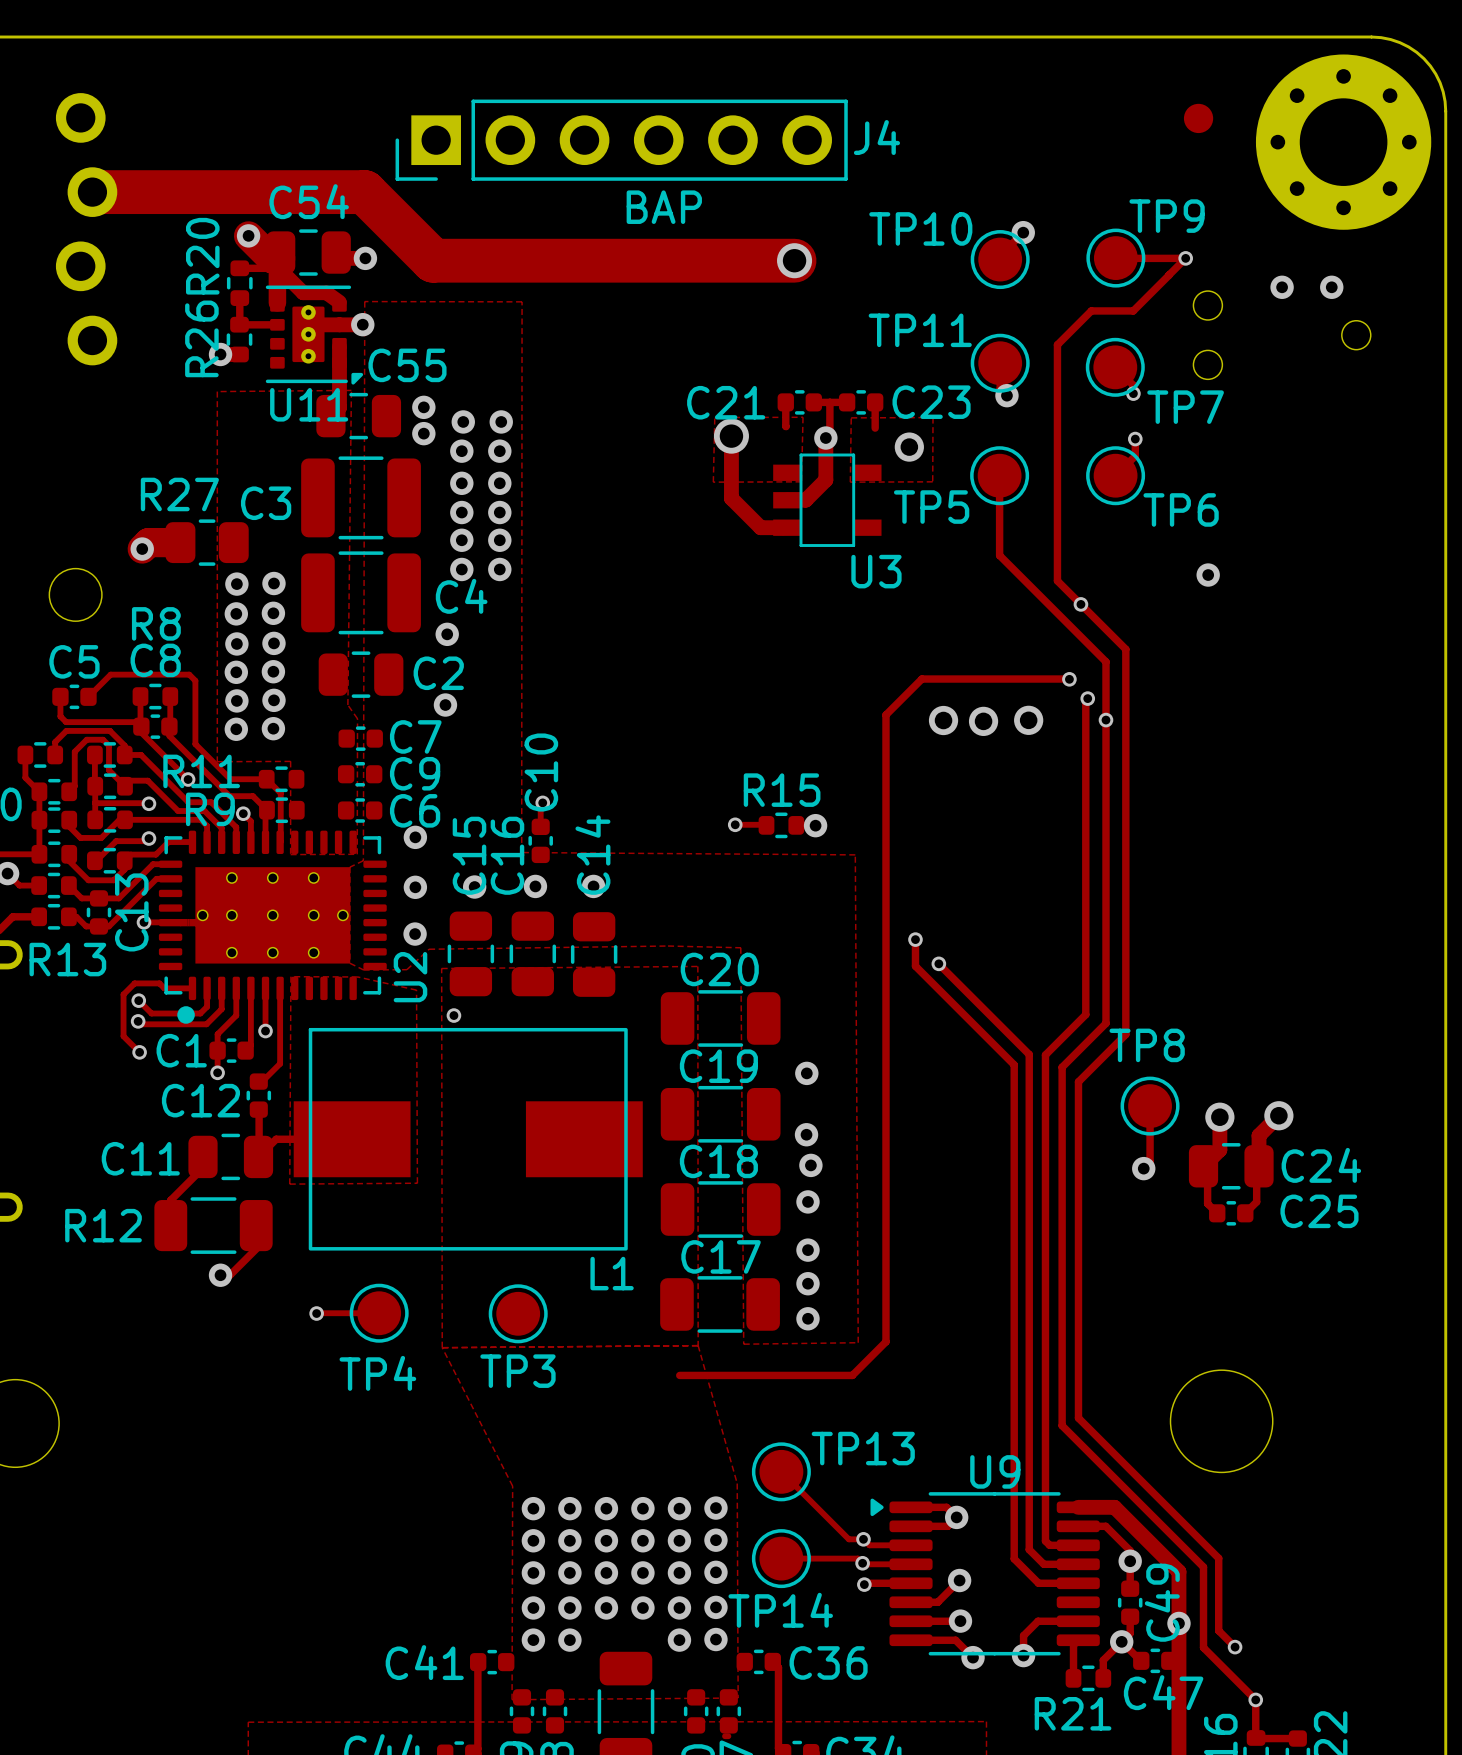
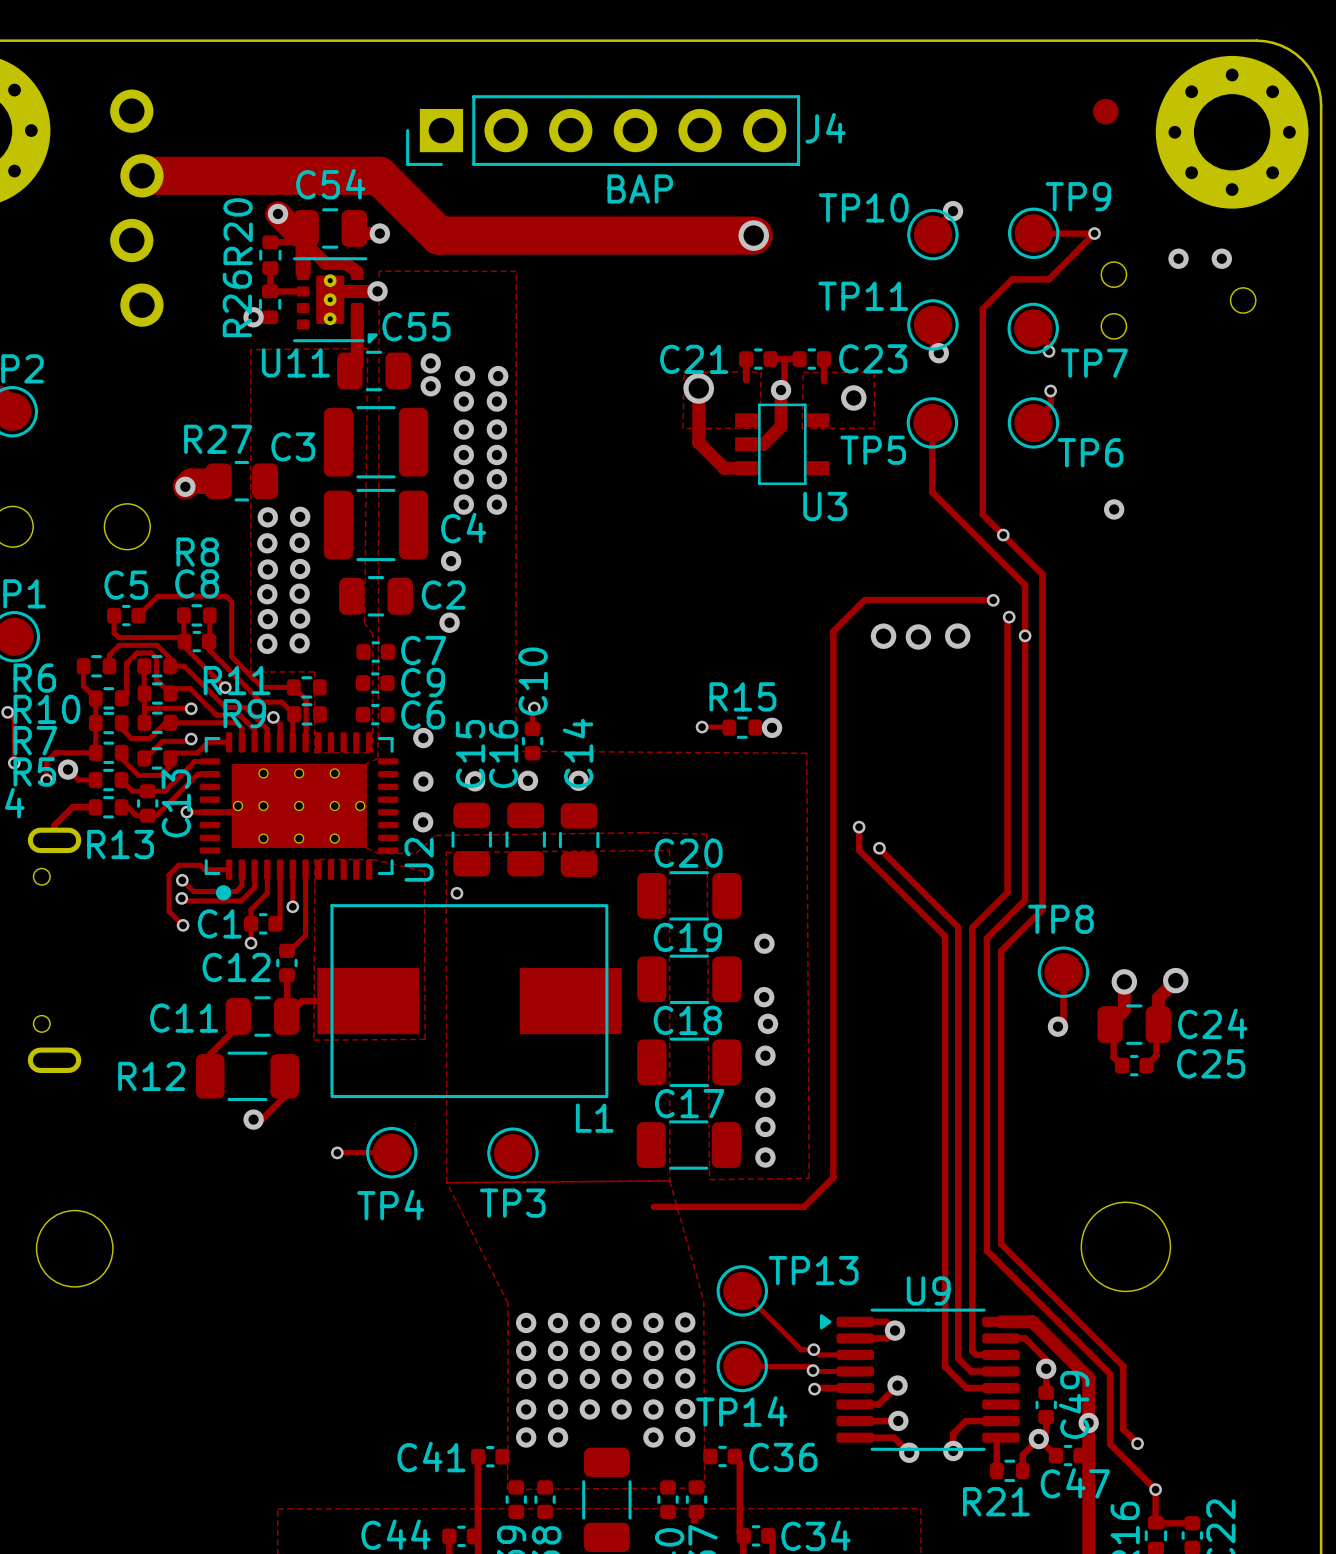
U11 name position: U11 (309, 404) -> U11 (295, 362)

